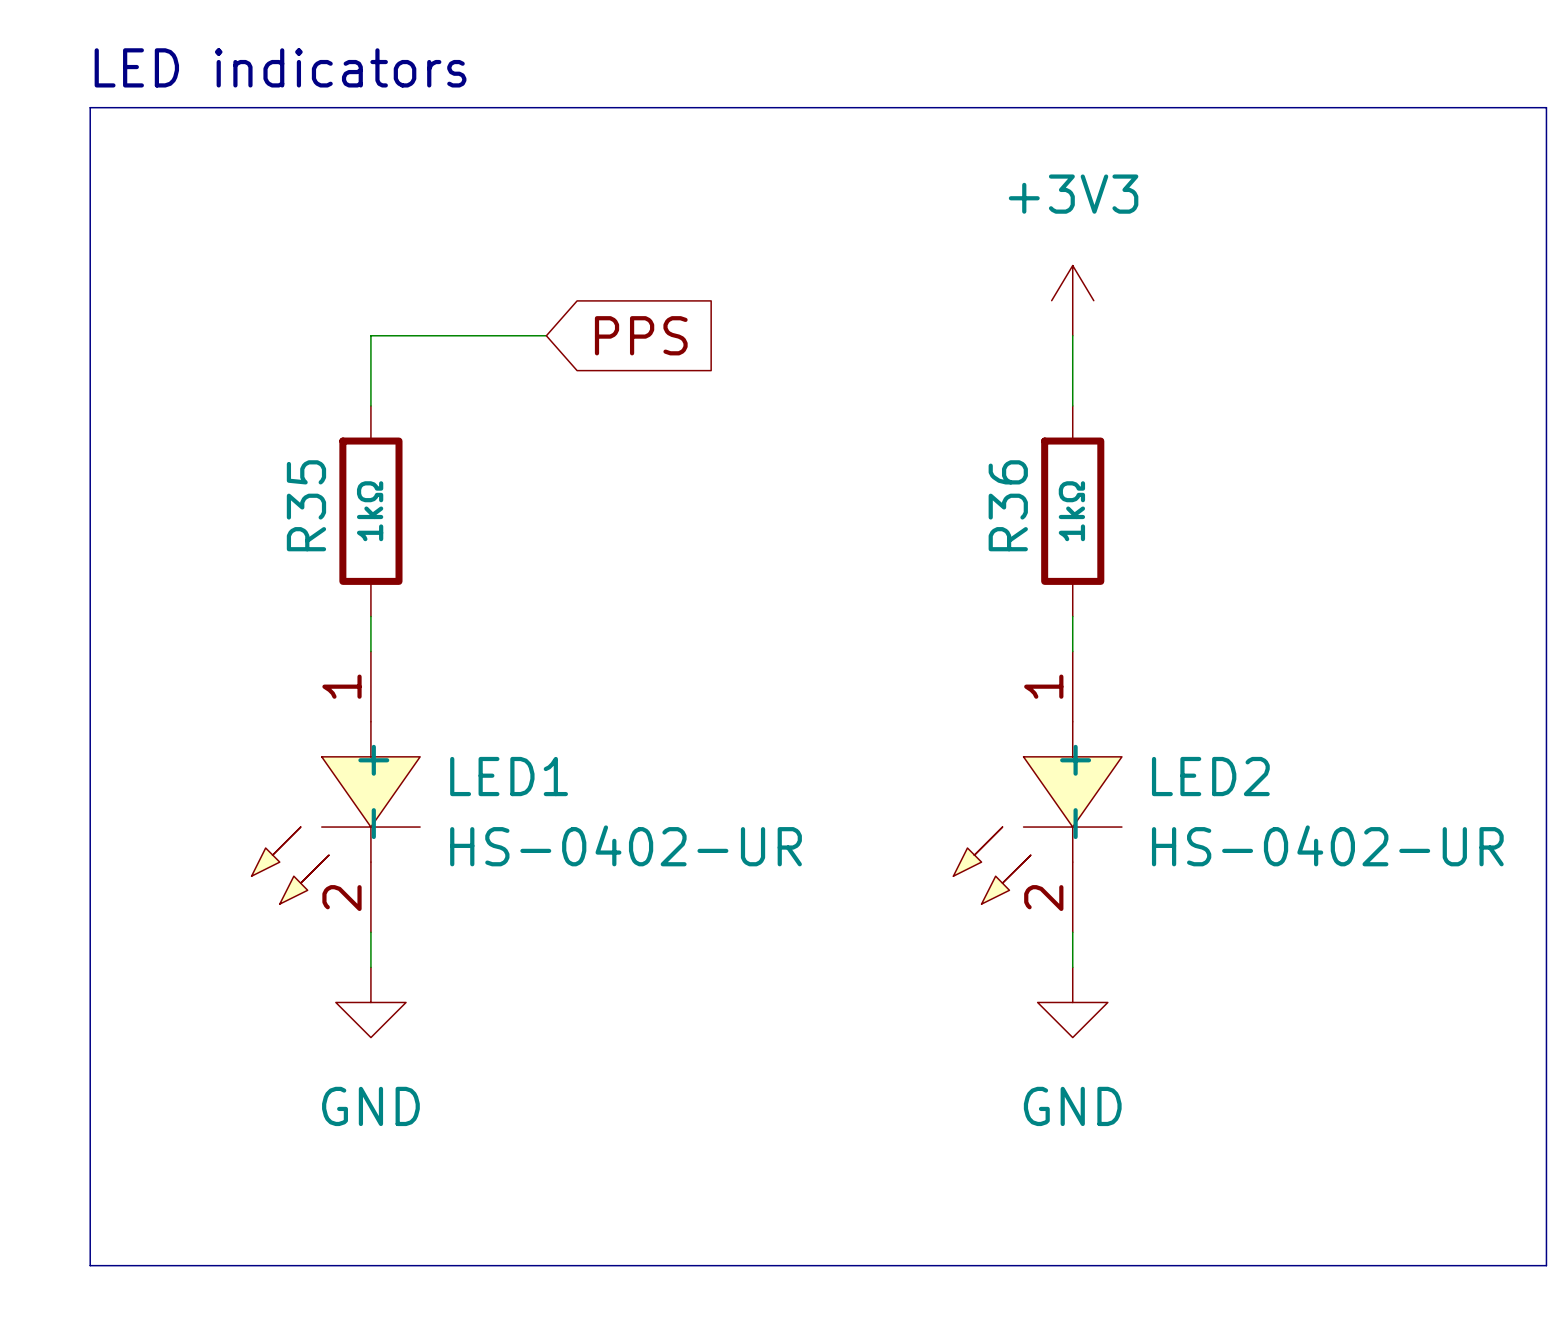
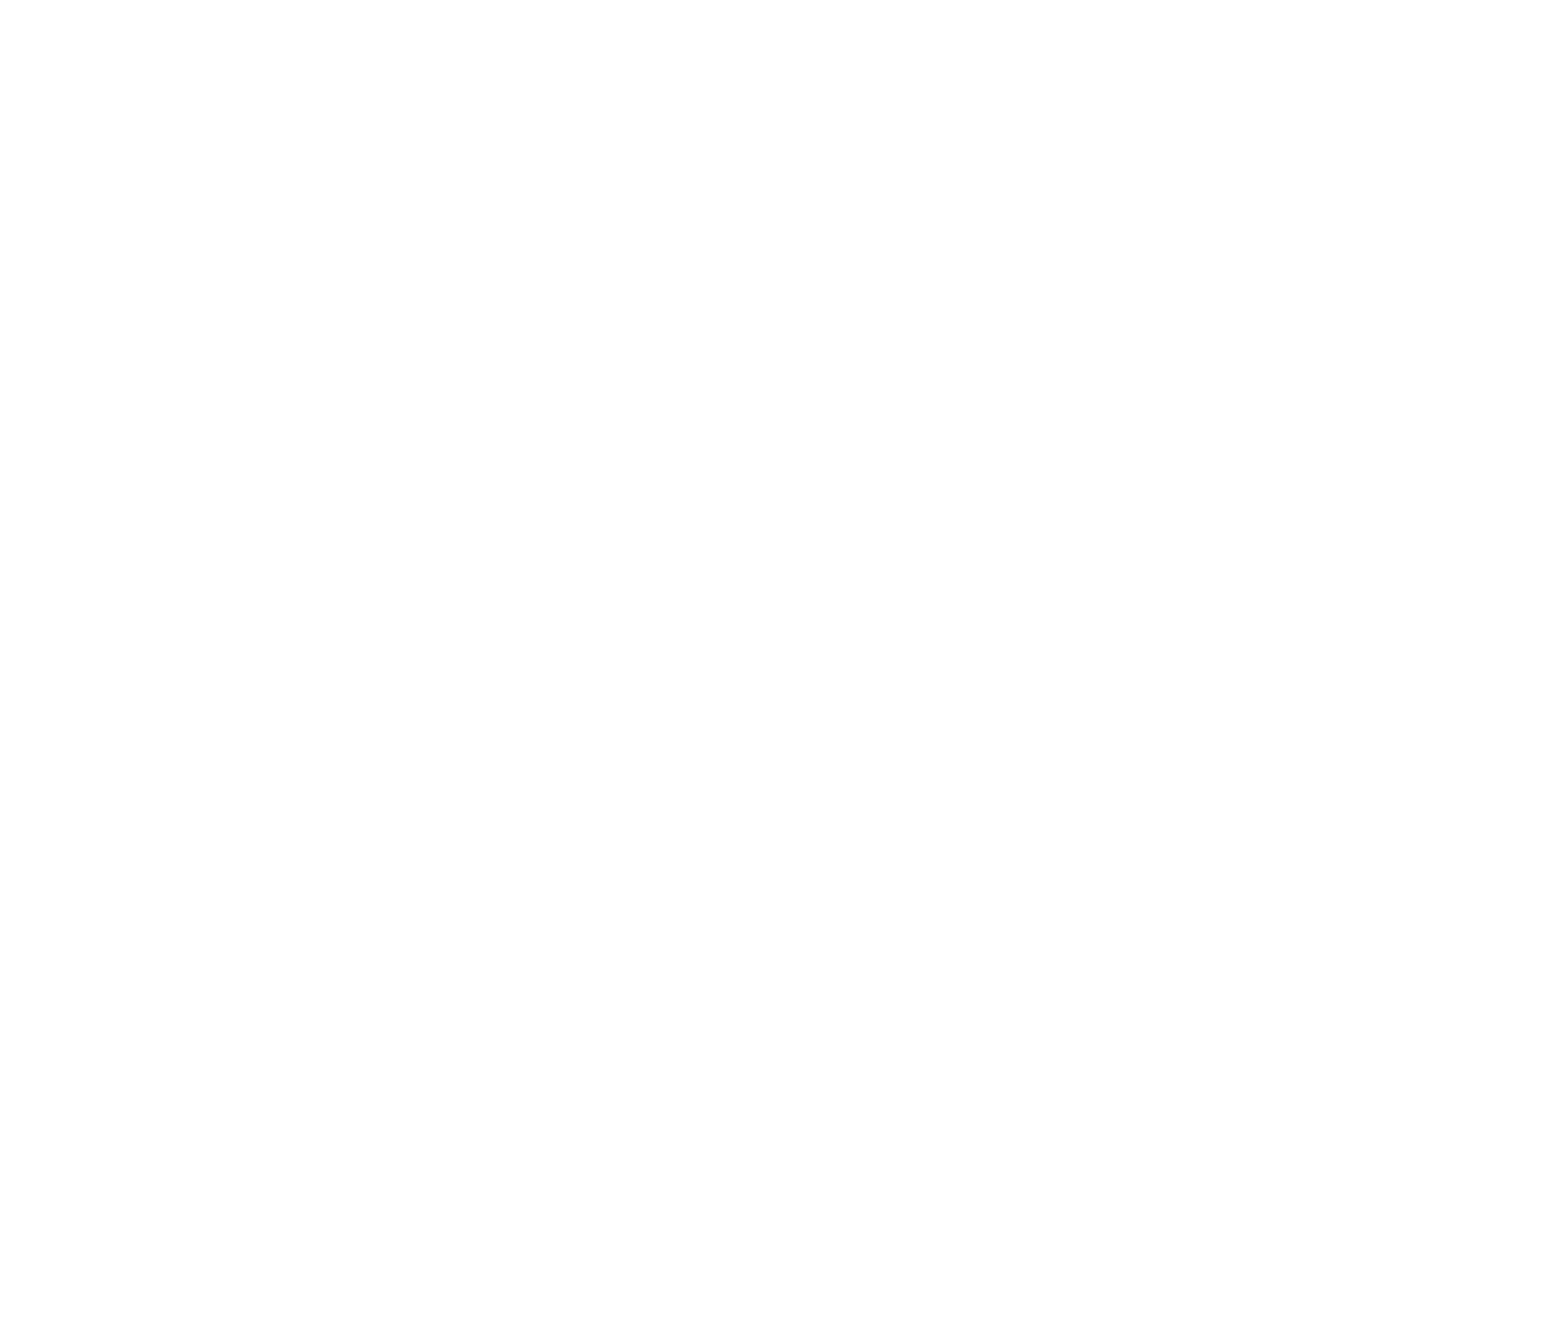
text: LED indicators (280, 67) -> none
line: (90, 107) (1546, 107) (1546, 1265) (90, 1265) (90, 107) -> none
power symbol: +3V3 (1072, 300) -> none
wire: (546, 335) (370, 335) (370, 405) -> none
global label: PPS (641, 335) -> none
wire: (1072, 335) (1072, 405) -> none
R35: 1kΩ (370, 511) -> none
R36: 1kΩ (1072, 511) -> none
wire: (370, 616) (370, 651) -> none
wire: (1072, 616) (1072, 651) -> none
LED1: HS-0402-UR (335, 791) -> none
LED2: HS-0402-UR (1037, 791) -> none
wire: (370, 932) (370, 967) -> none
wire: (1072, 932) (1072, 967) -> none
power symbol: GND (370, 1002) -> none
power symbol: GND (1072, 1002) -> none

